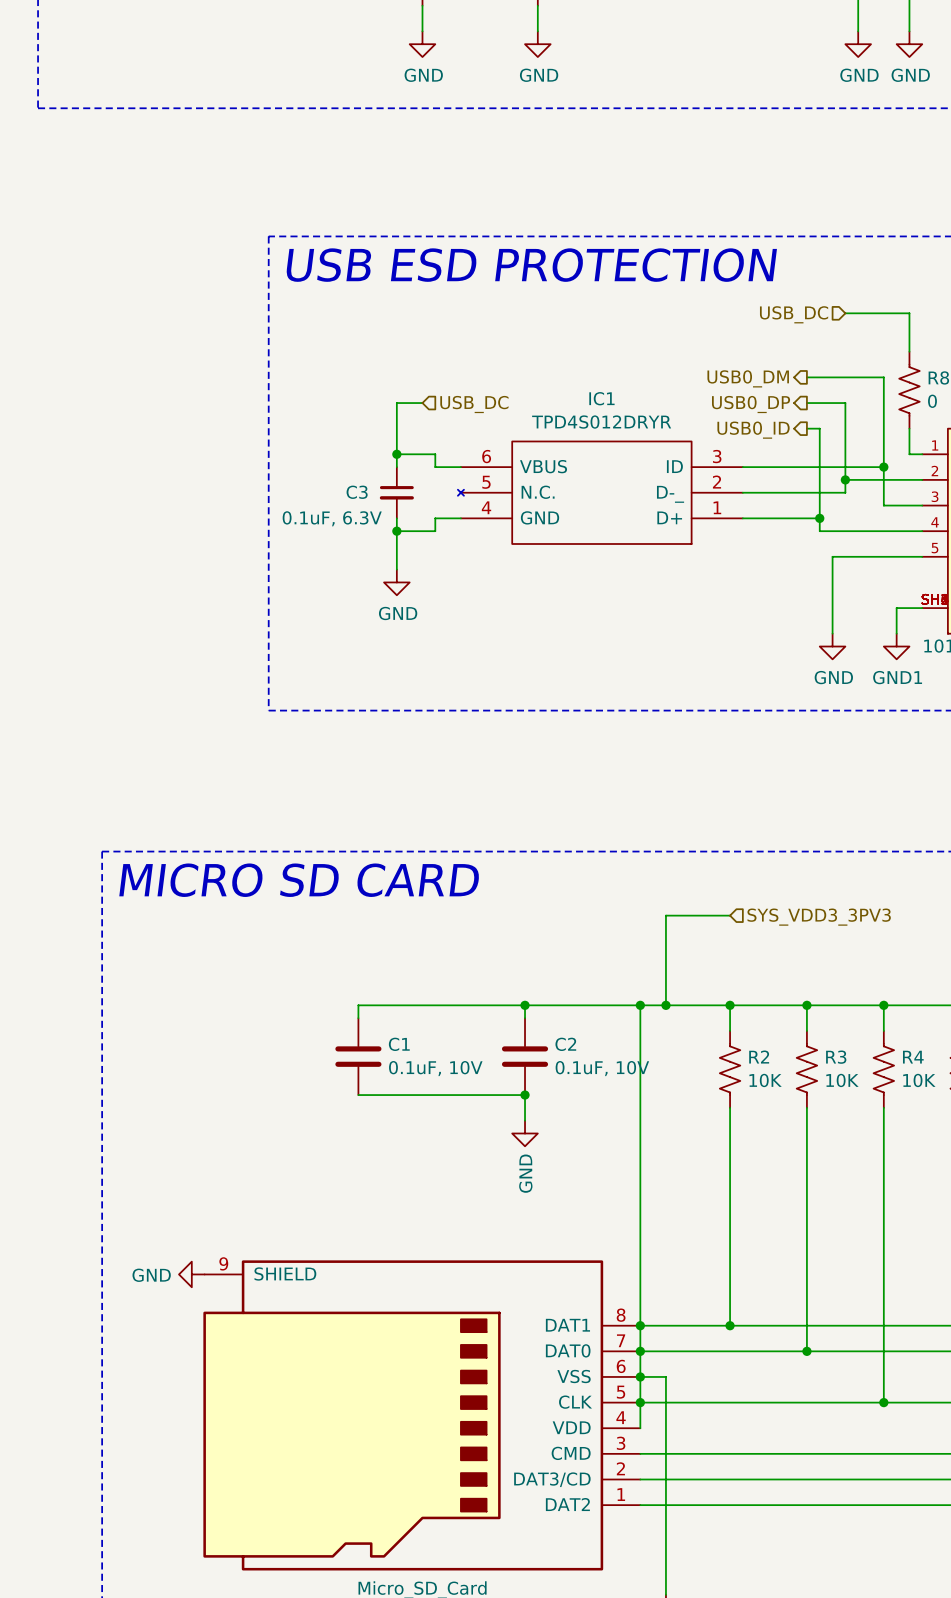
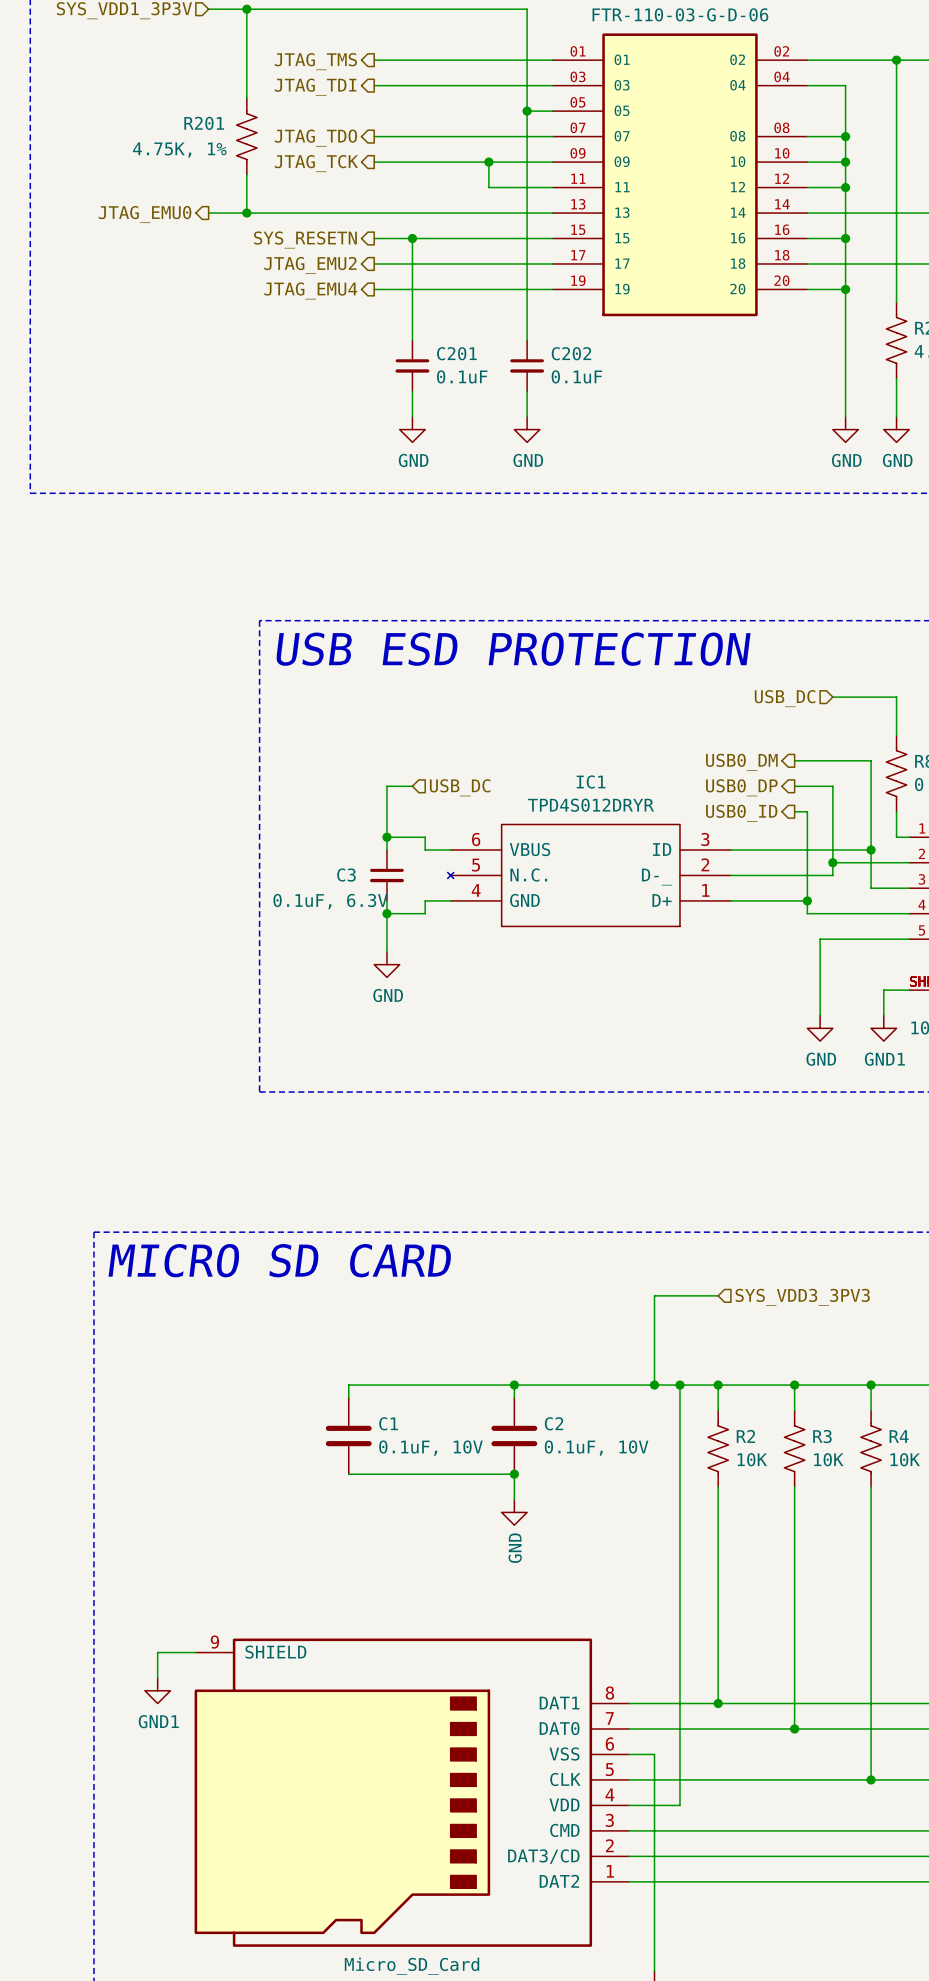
wire: (640, 1005) (640, 1428) -> (679, 1385) (679, 1805) (629, 1805)
junction position: (640, 1005) -> (679, 1385)
power symbol: GND (191, 1274) -> none
wire: none -> (195, 1652) (157, 1652) (157, 1678)
power symbol: none -> GND1 (157, 1690)
junction: (640, 1325) -> none
junction: (640, 1351) -> none
junction: (640, 1376) -> none
junction: (640, 1402) -> none

